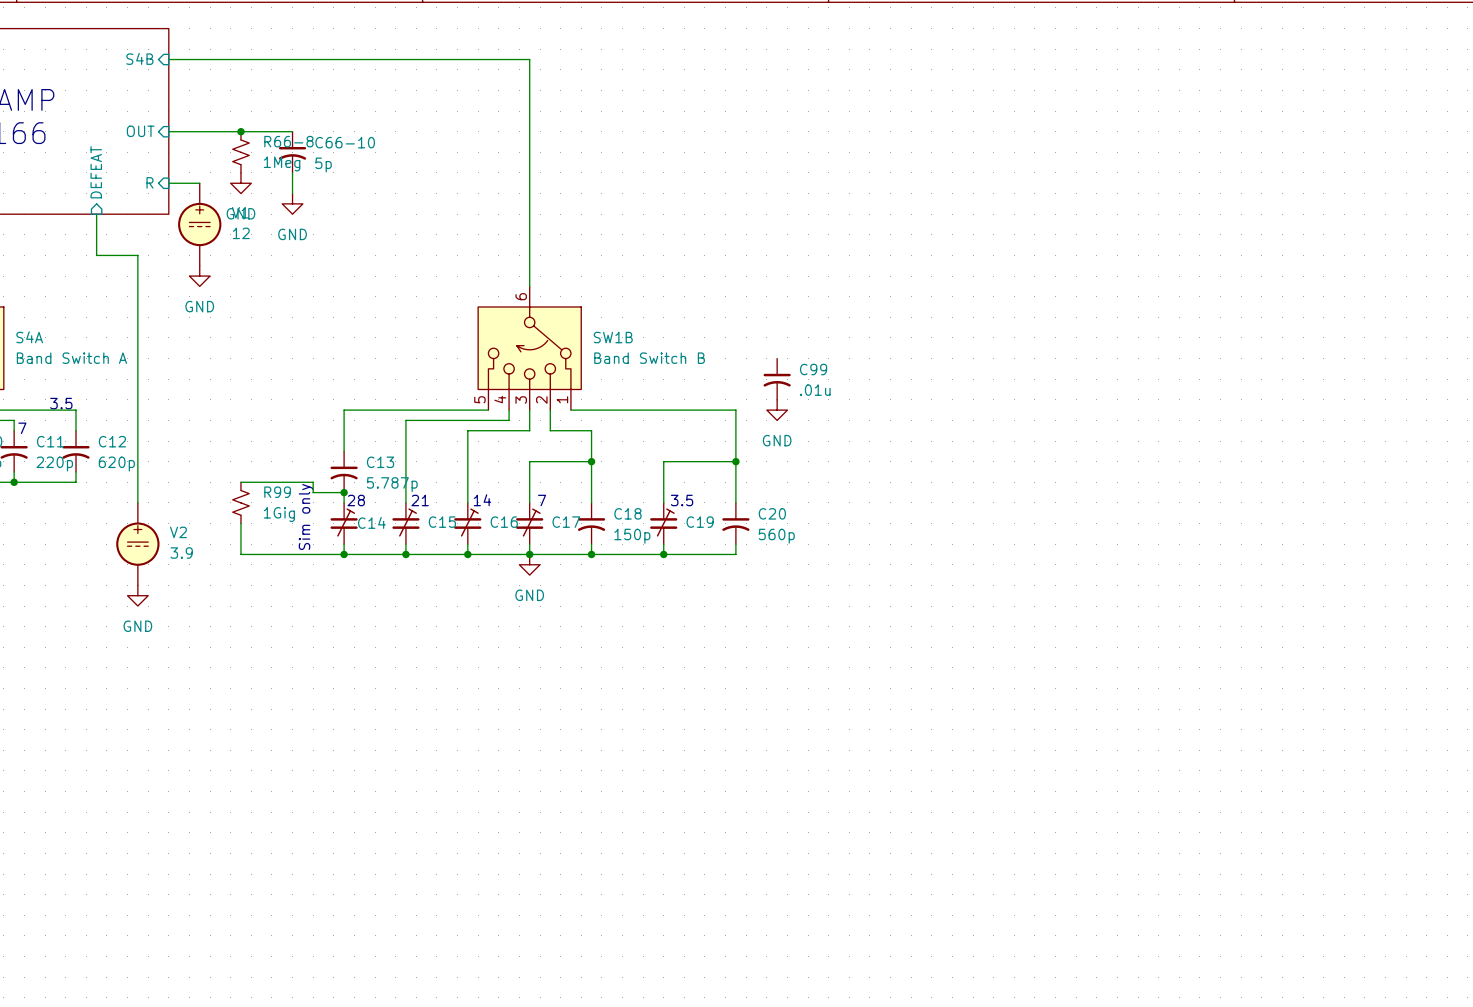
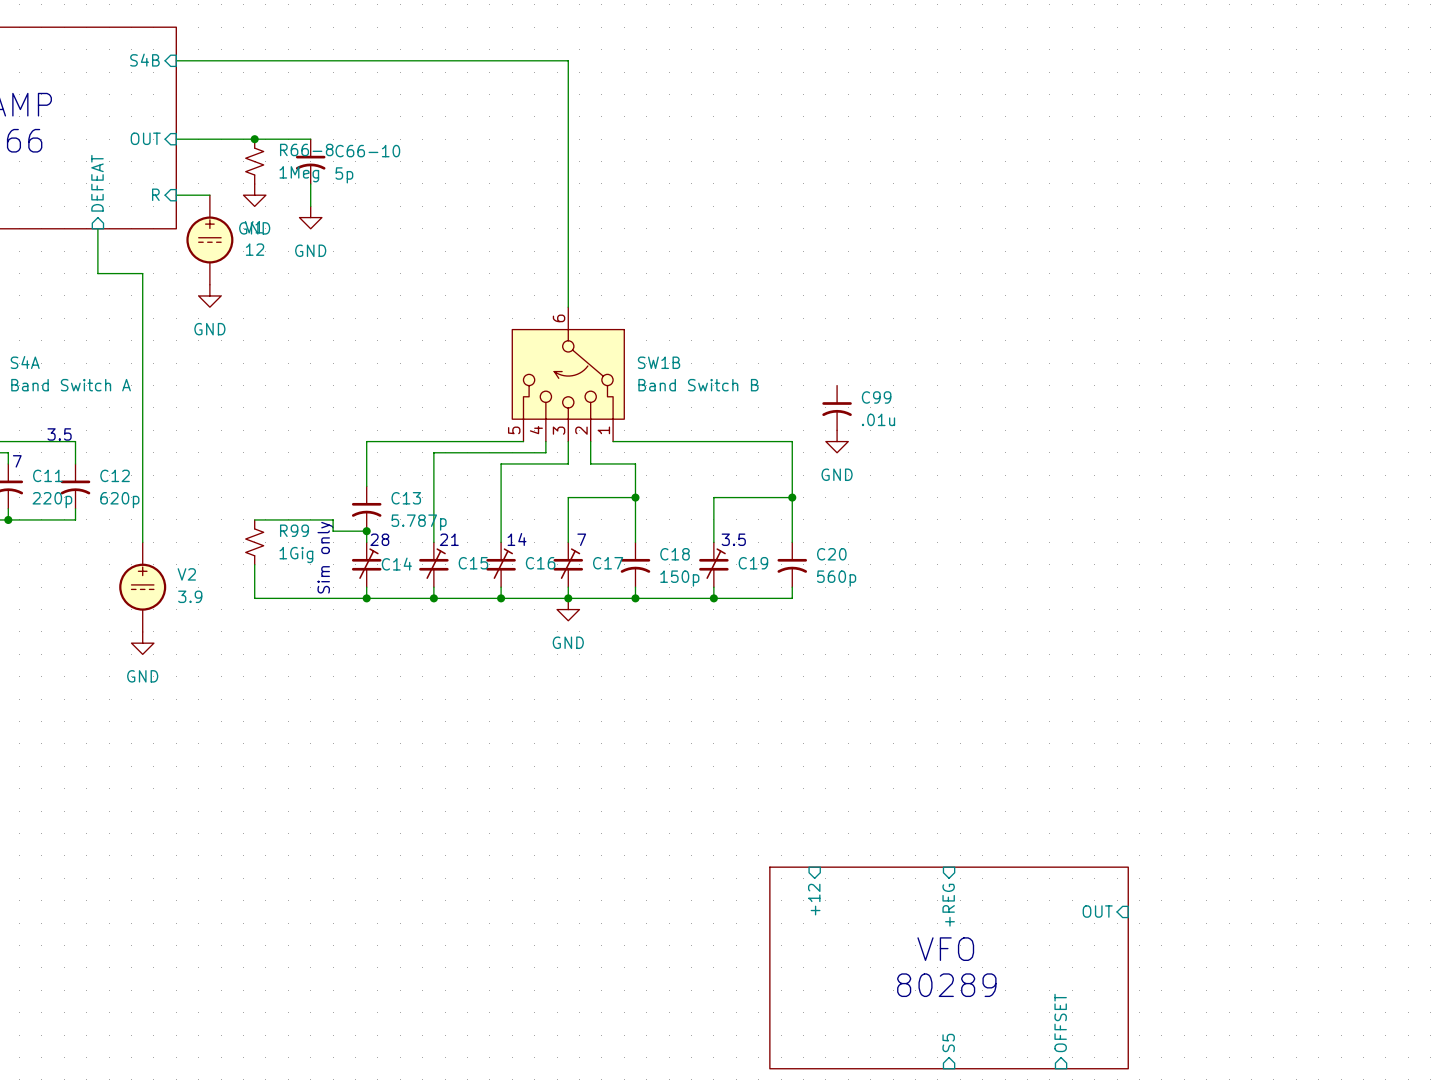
sheet pin: none -> +12 (814, 899)
sheet pin: none -> +REG (948, 905)
sheet pin: none -> OUT (1097, 911)
text: none -> VFO (945, 949)
sheet: none -> (949, 967)
text: none -> 80289 (946, 985)
sheet pin: none -> OFFSET (1060, 1022)
sheet pin: none -> S5 (948, 1042)

